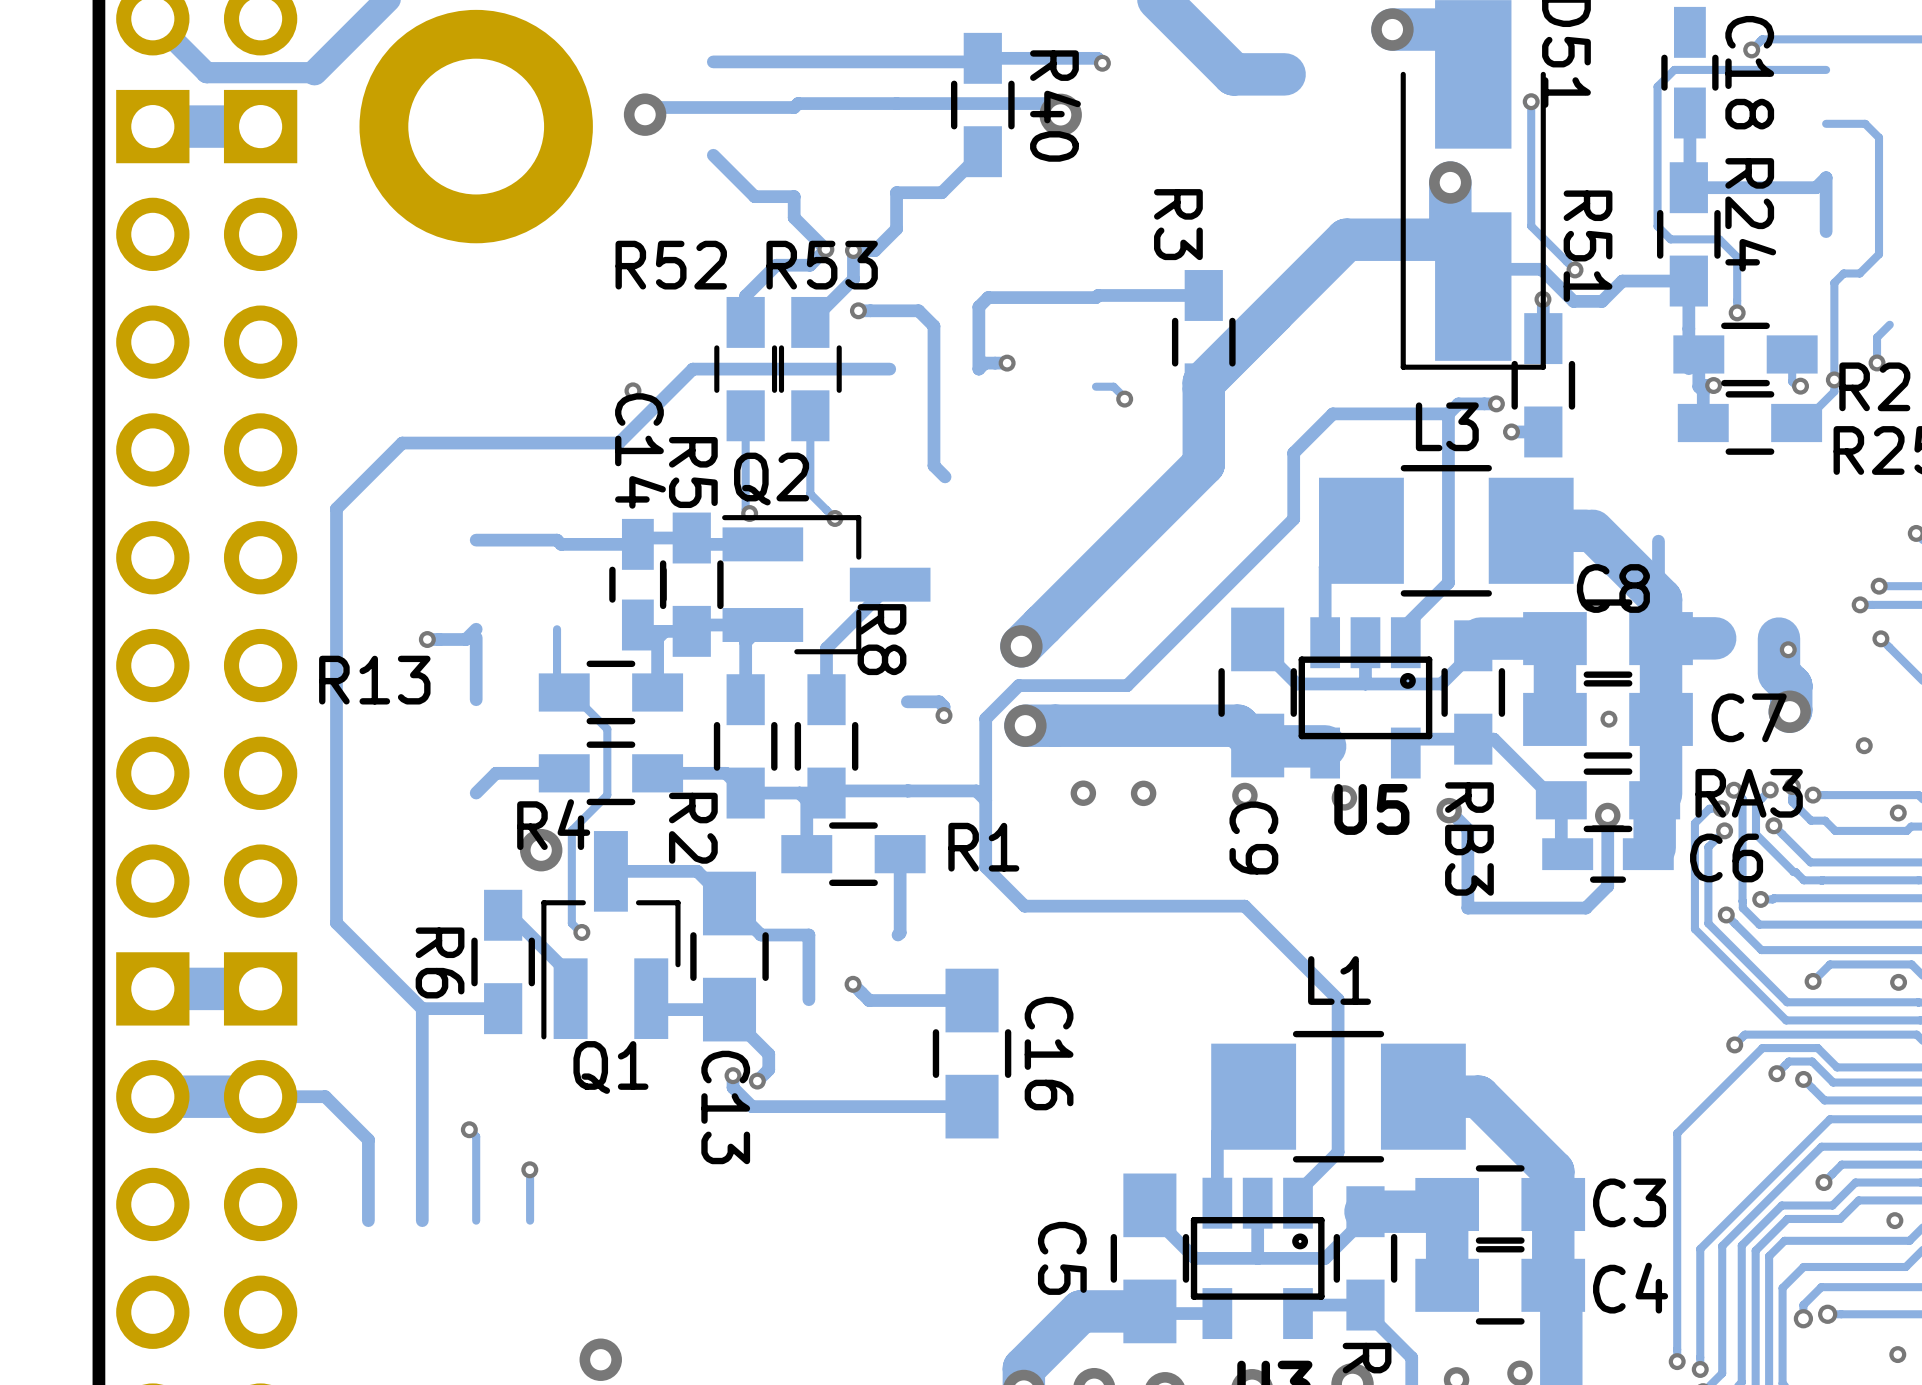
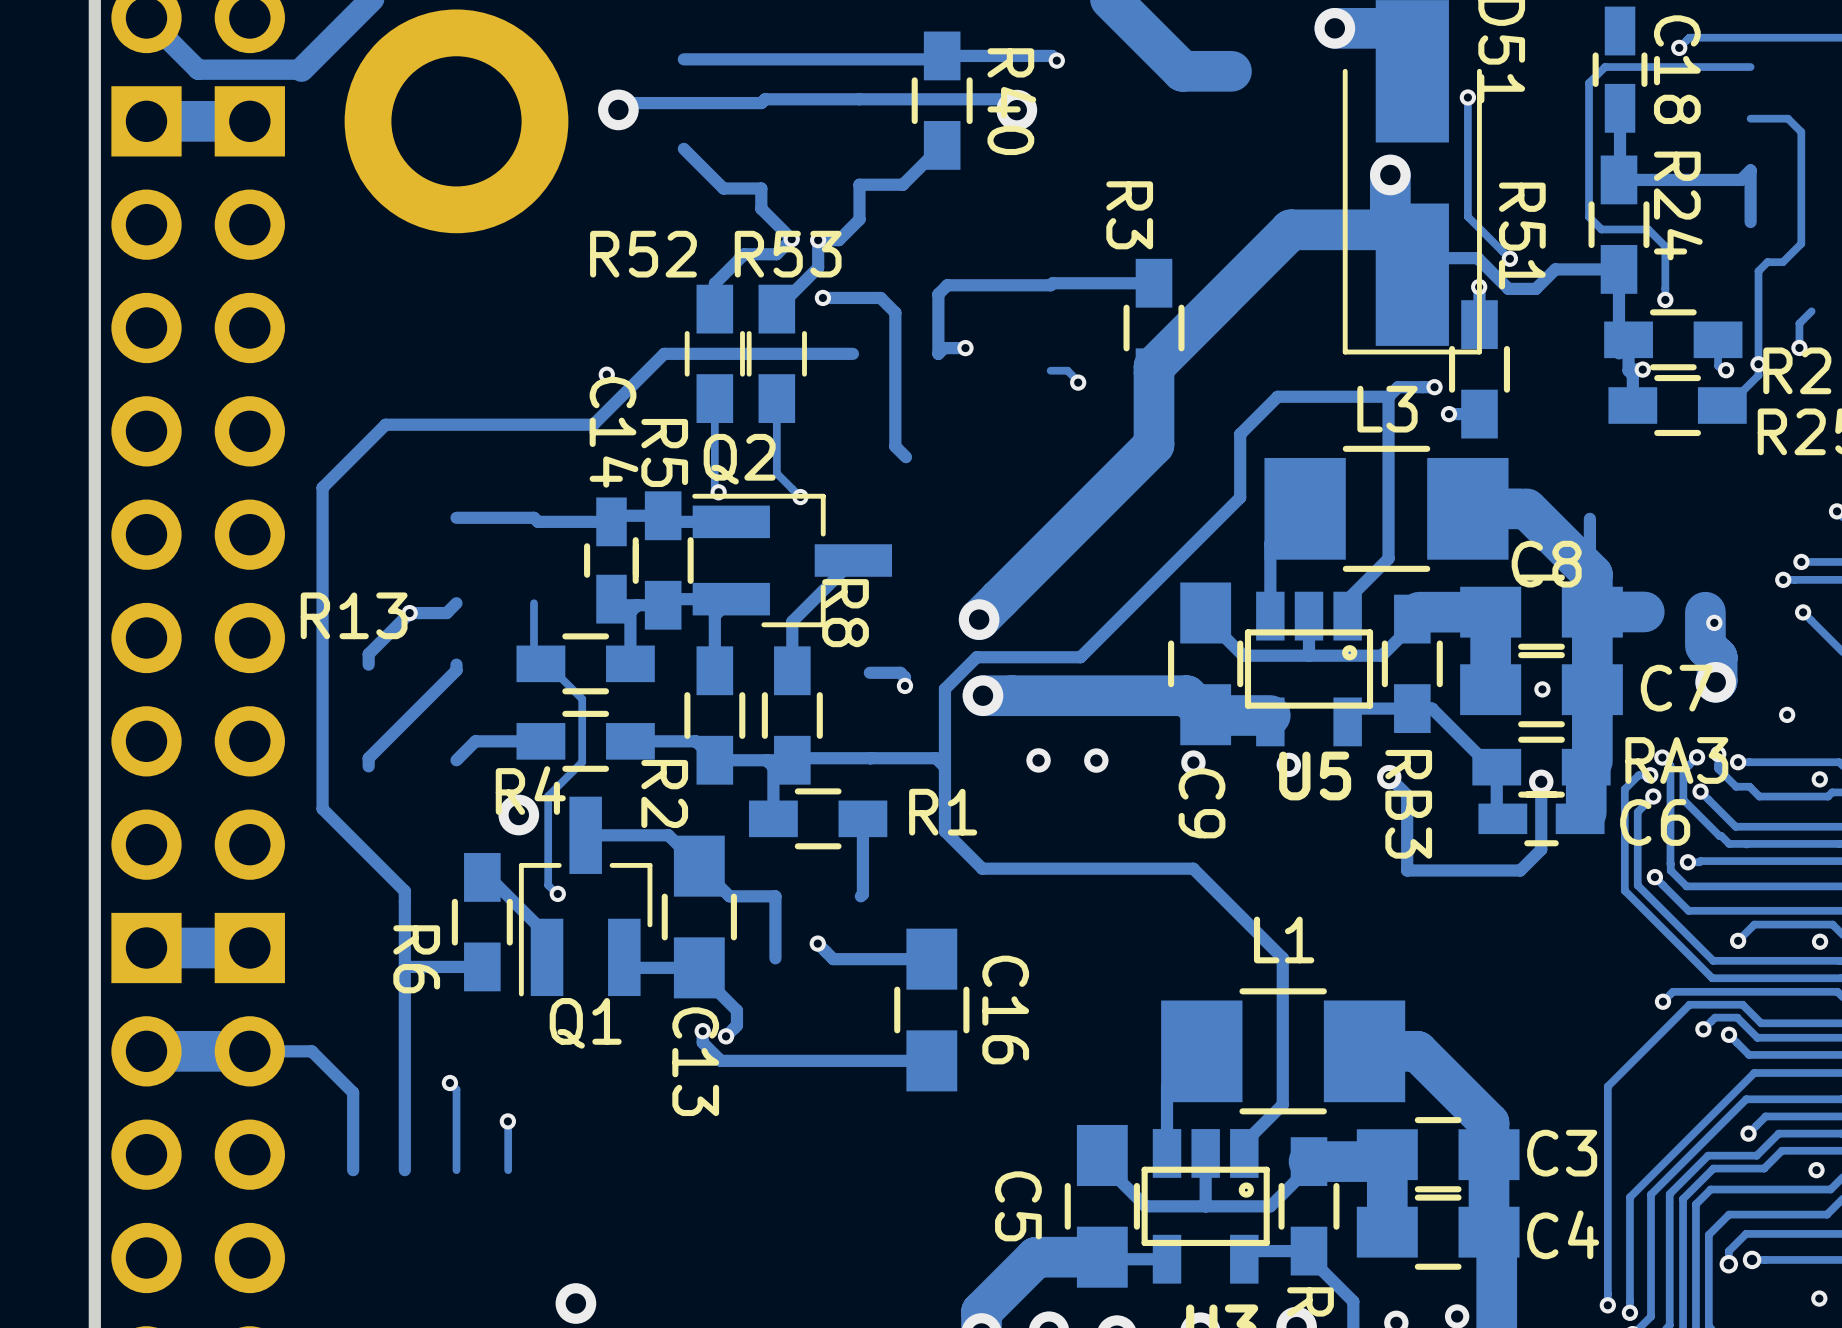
track: (476, 637) (476, 693) -> none
track: none -> (409, 613) (368, 654) (368, 664)
R13 name position: R13 (374, 680) -> R13 (354, 615)
track: none -> (456, 670) (368, 758) (368, 766)
track: (336, 843) (336, 923) (422, 1008) -> (322, 808) (404, 891) (404, 967)
R6 name position: R6 (440, 962) -> R6 (416, 959)

